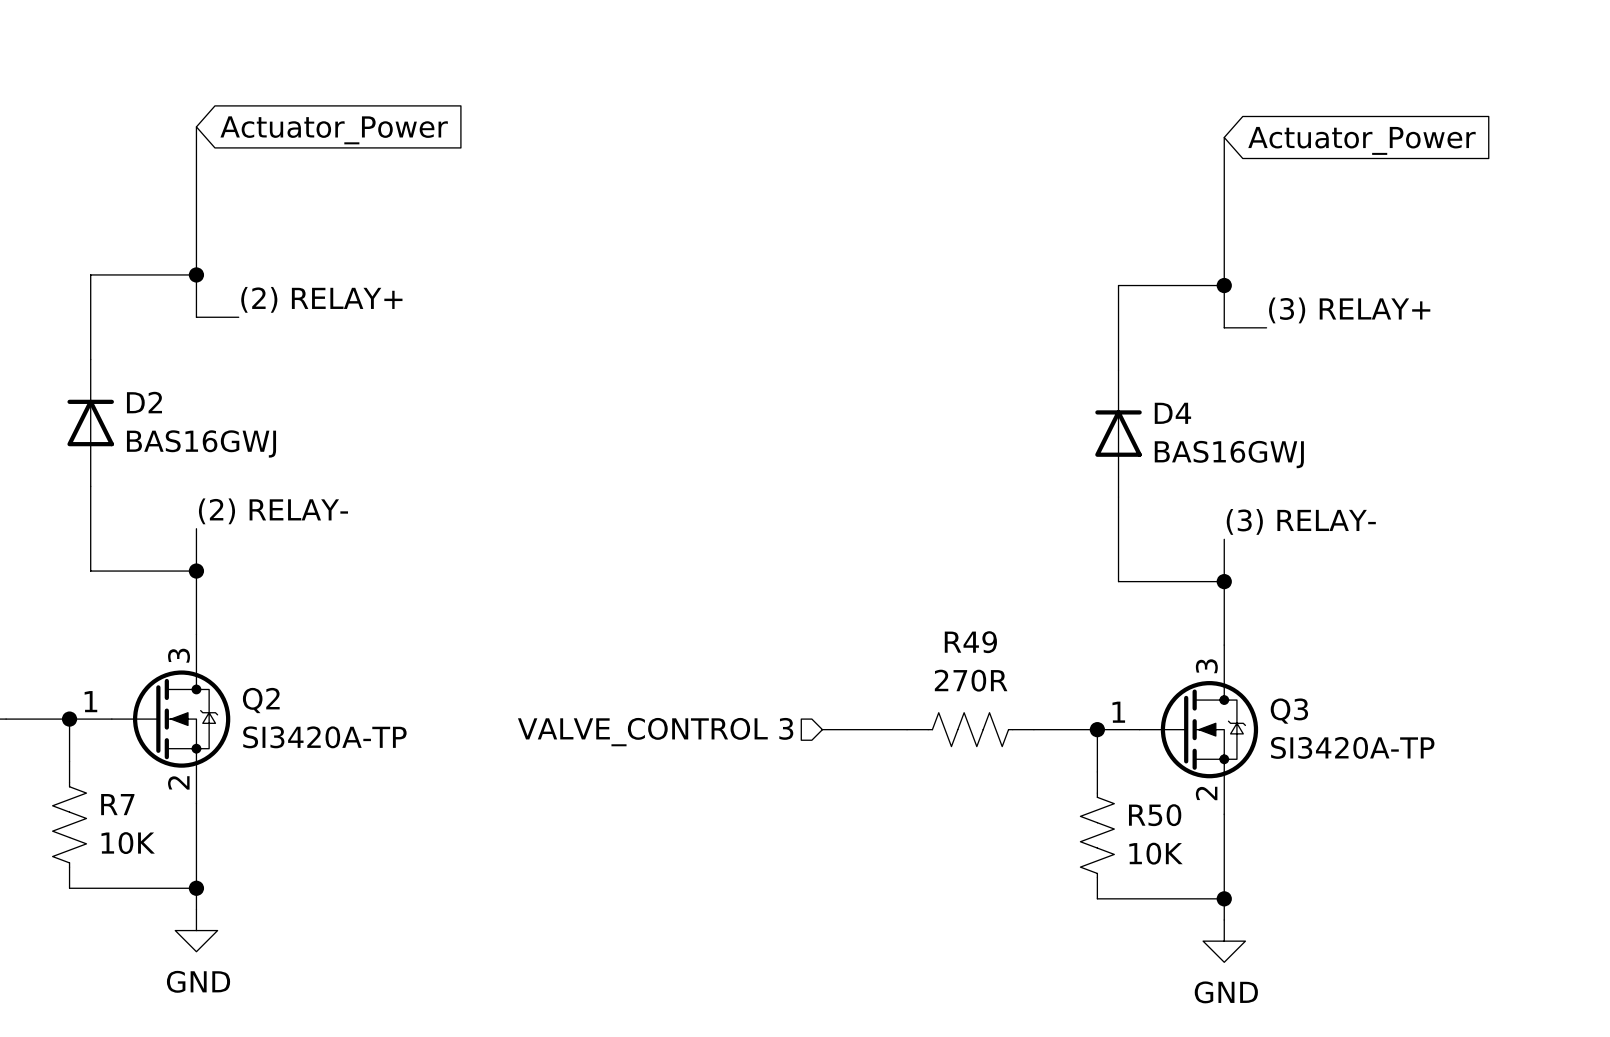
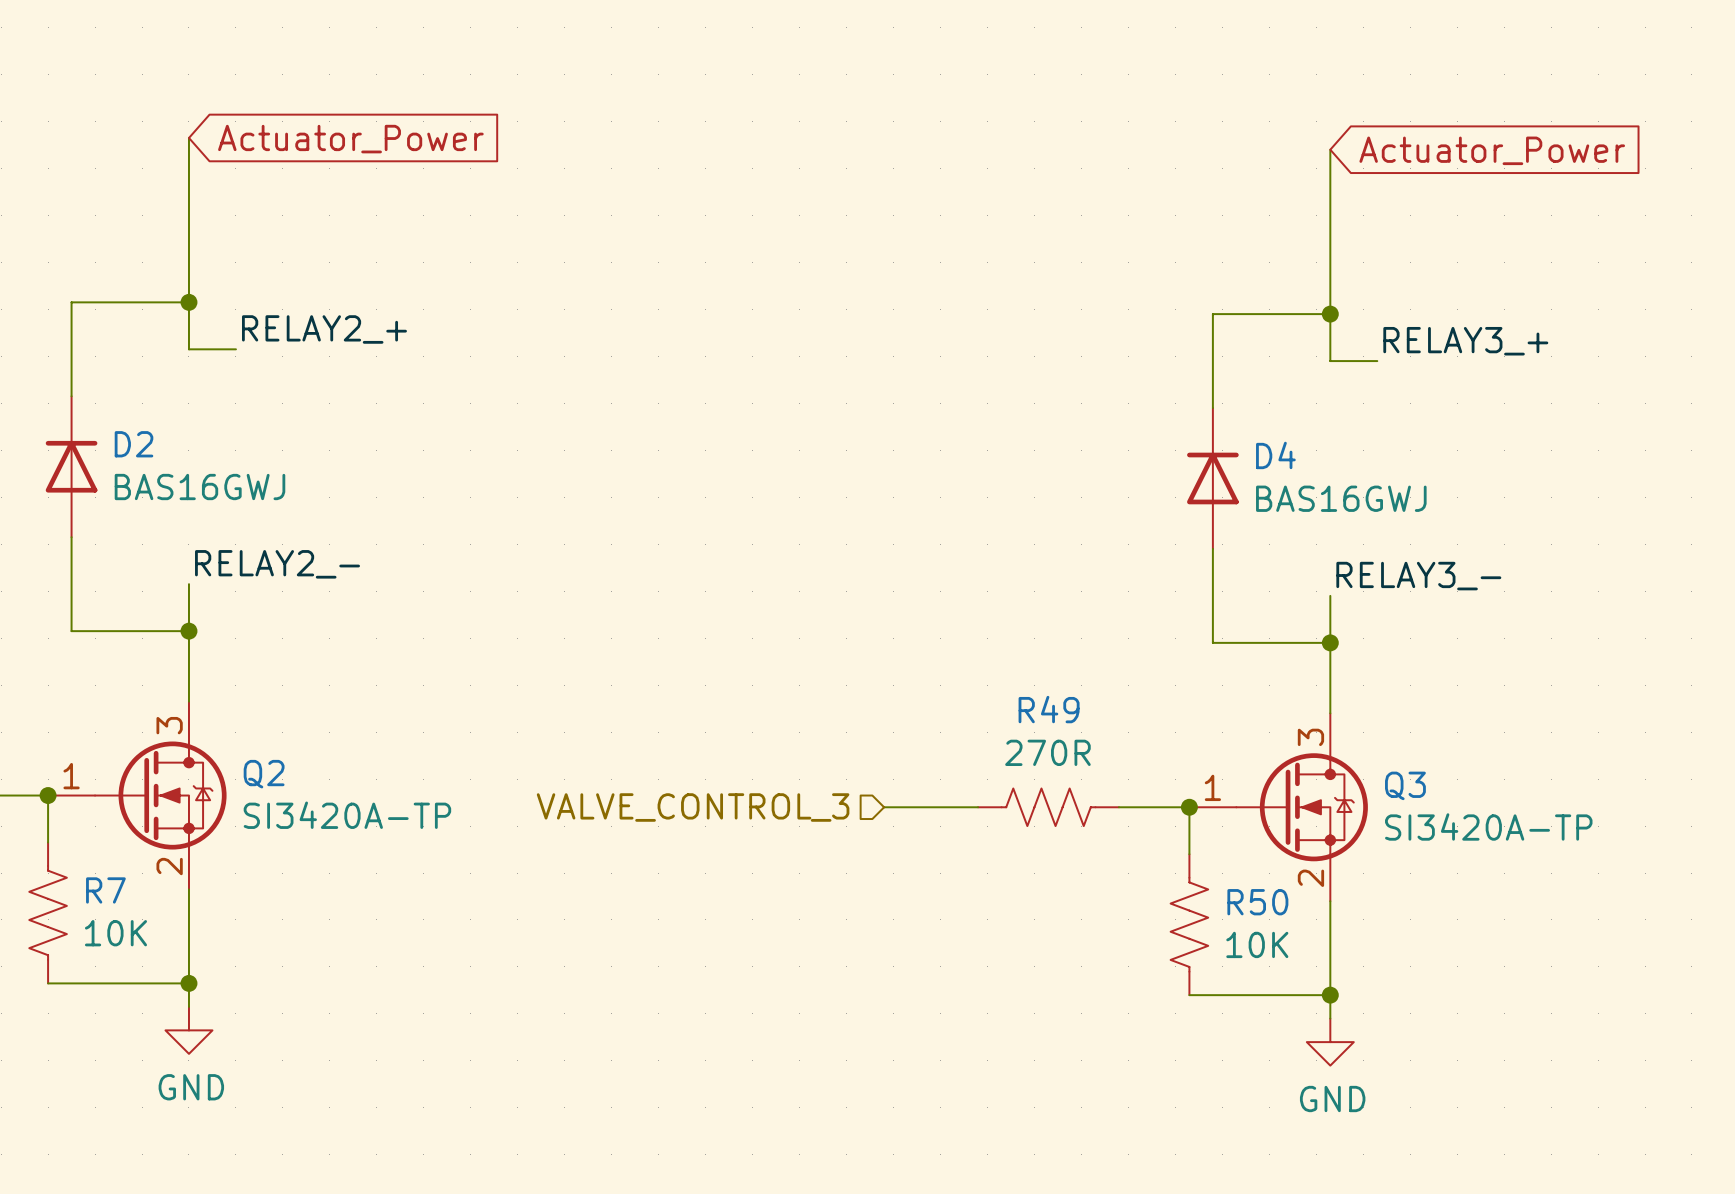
label: (2) RELAY+ (321, 299) -> RELAY2_+ (324, 329)
label: (3) RELAY+ (1349, 310) -> RELAY3_+ (1465, 341)
label: (2) RELAY- (273, 511) -> RELAY2_- (277, 564)
label: (3) RELAY- (1301, 521) -> RELAY3_- (1418, 576)
hierarchical label: VALVE_CONTROL 3 (655, 732) -> VALVE_CONTROL_3 (693, 807)

